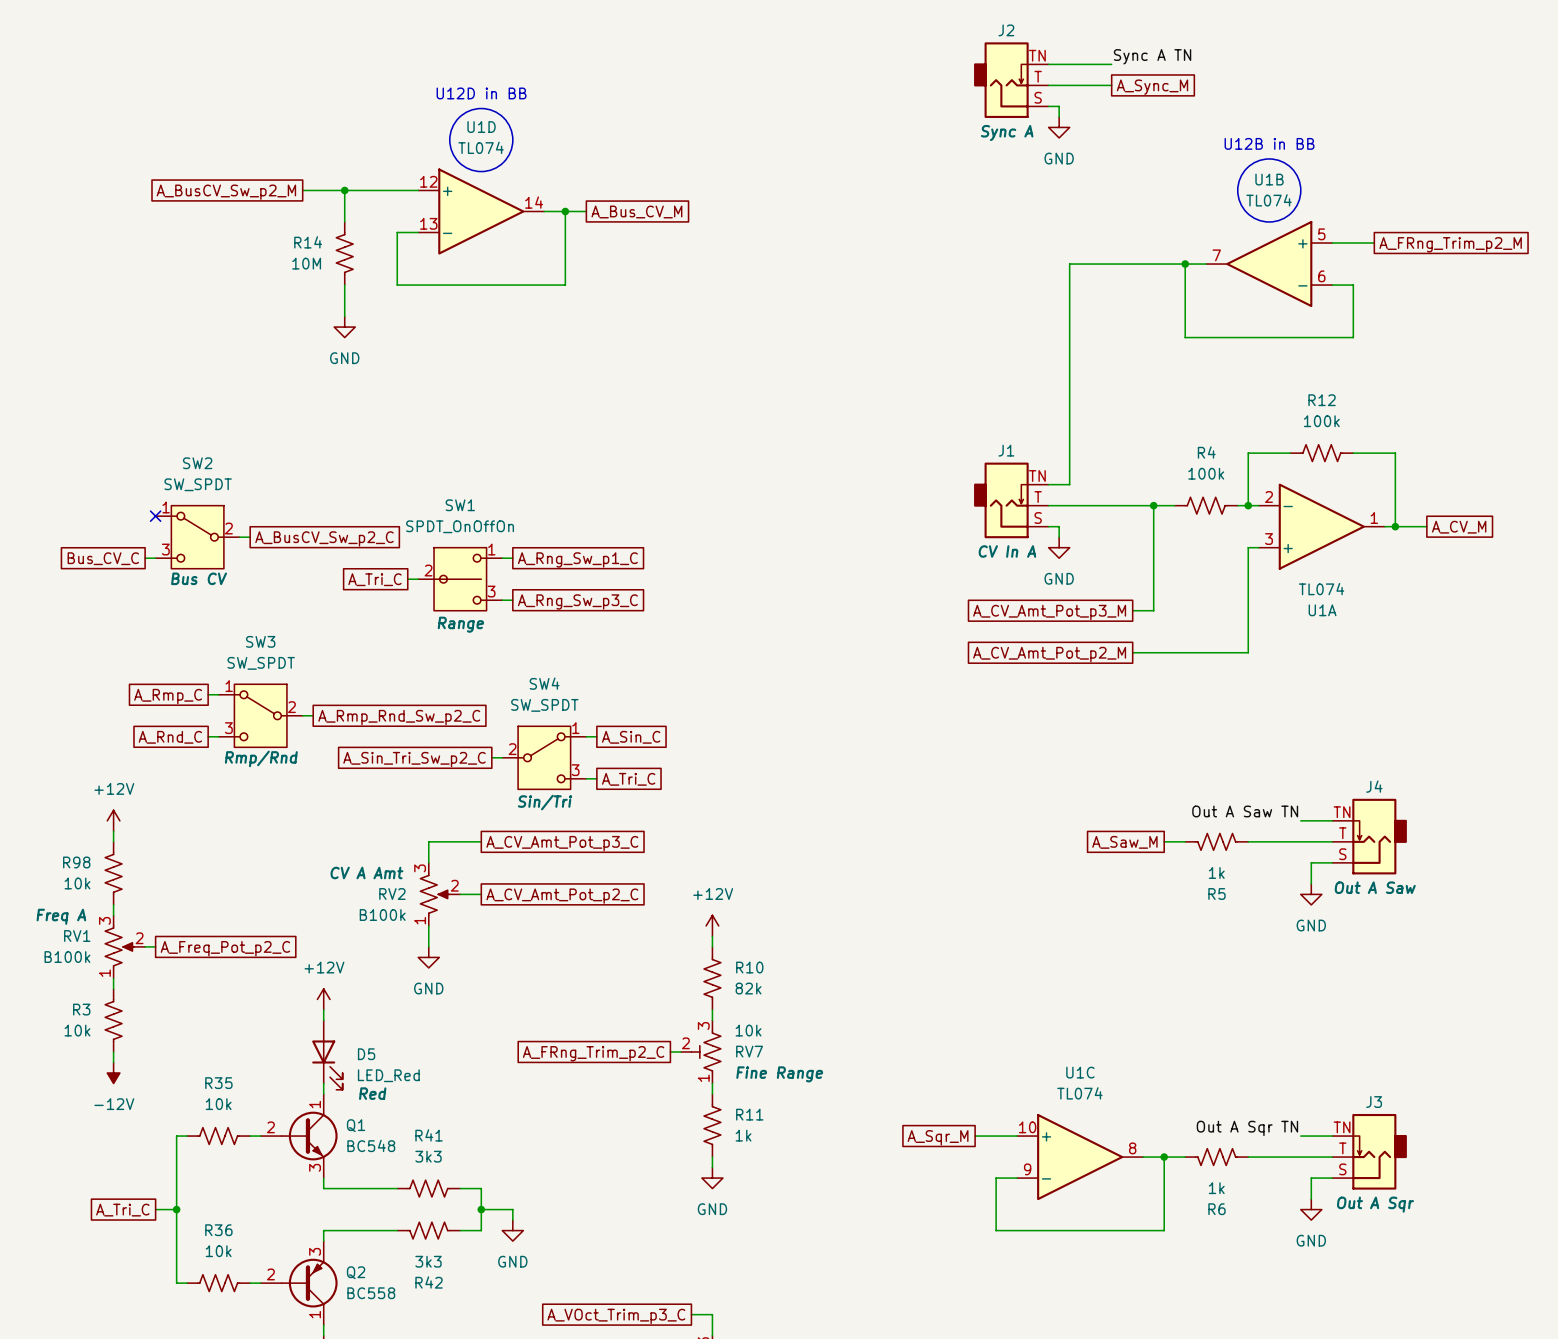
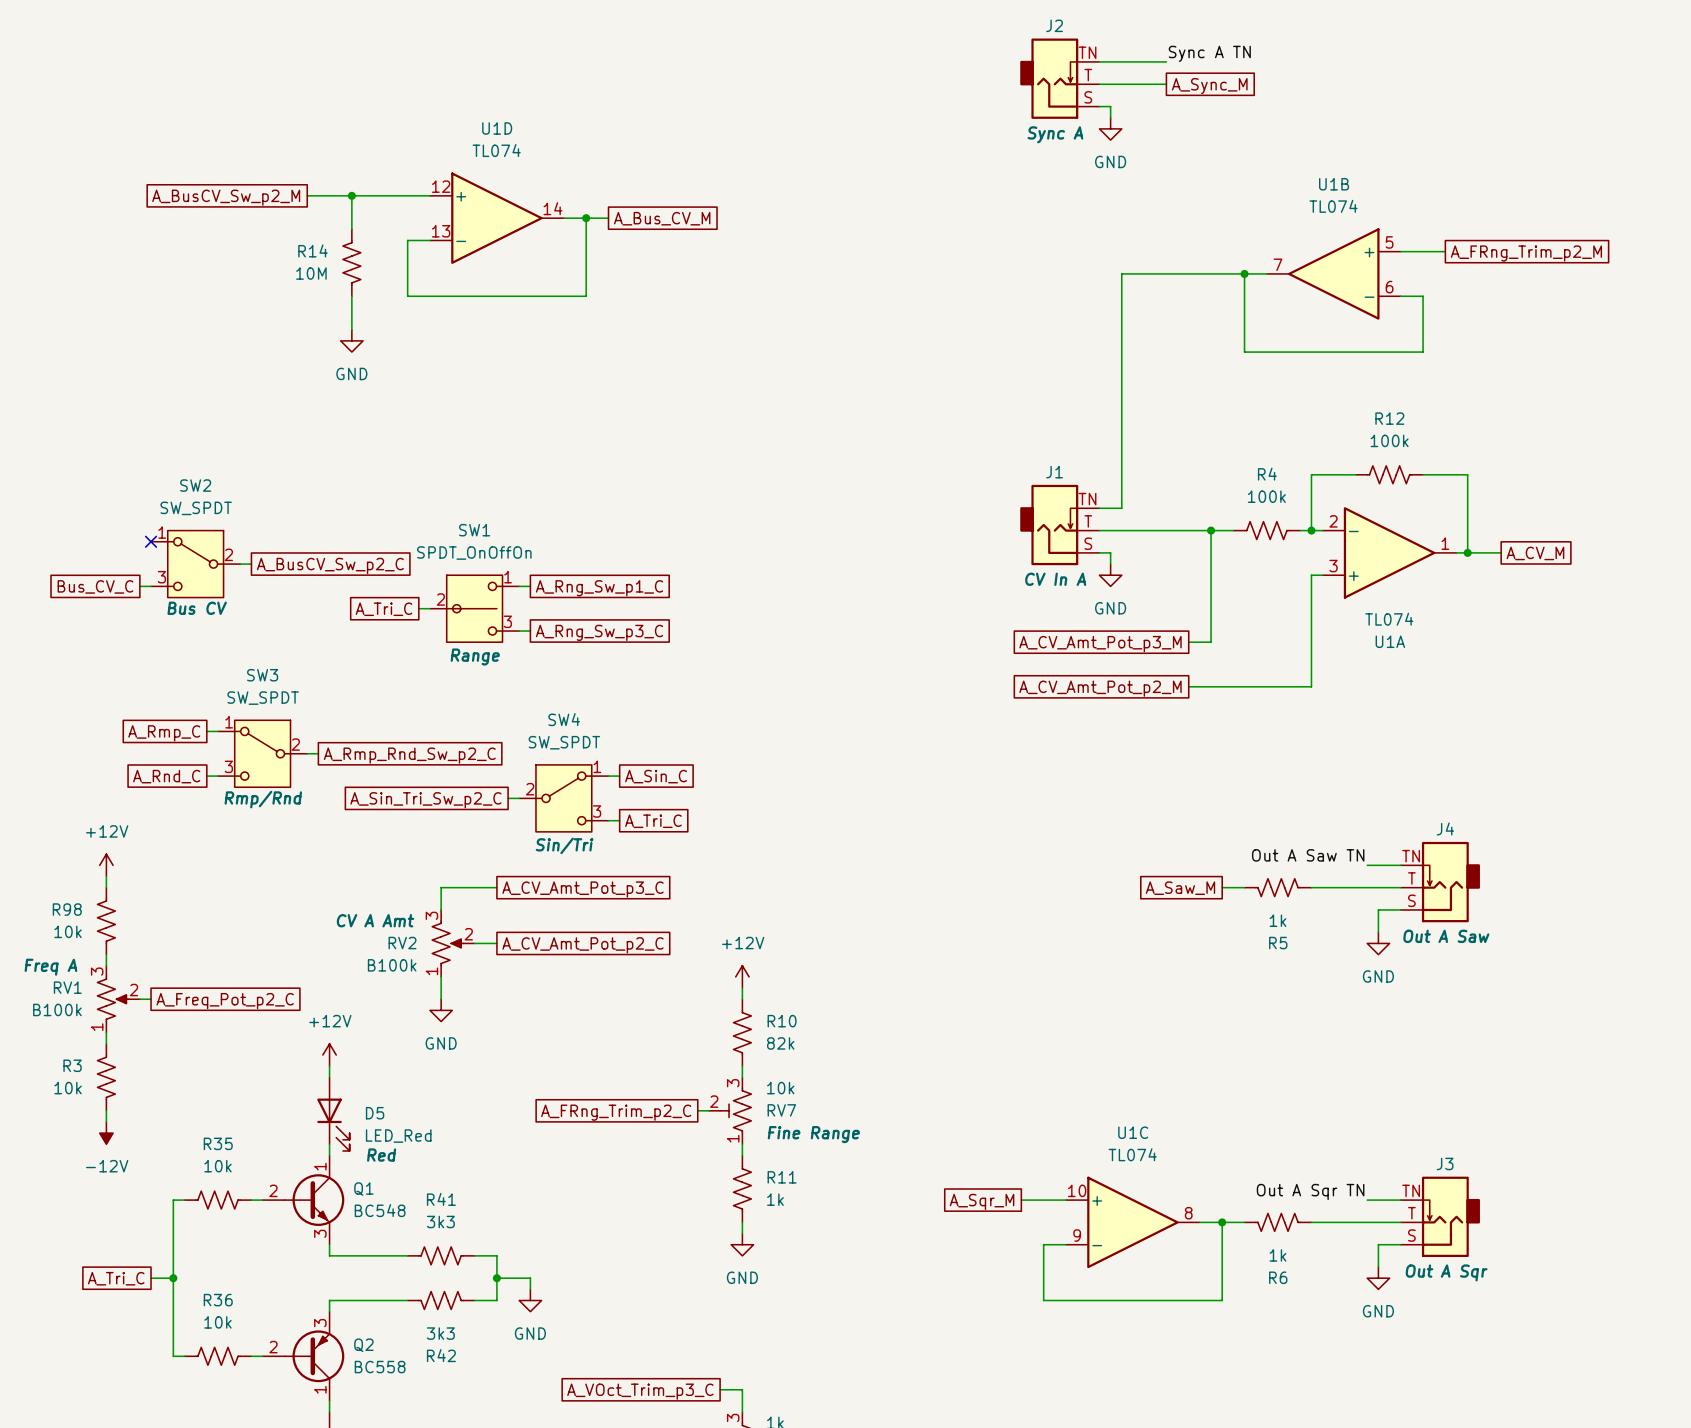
text: U12D in BB (481, 93) -> none
drawing: [449, 108, 513, 172] -> none
text: U12B in BB (1269, 143) -> none
drawing: [1237, 158, 1301, 222] -> none

